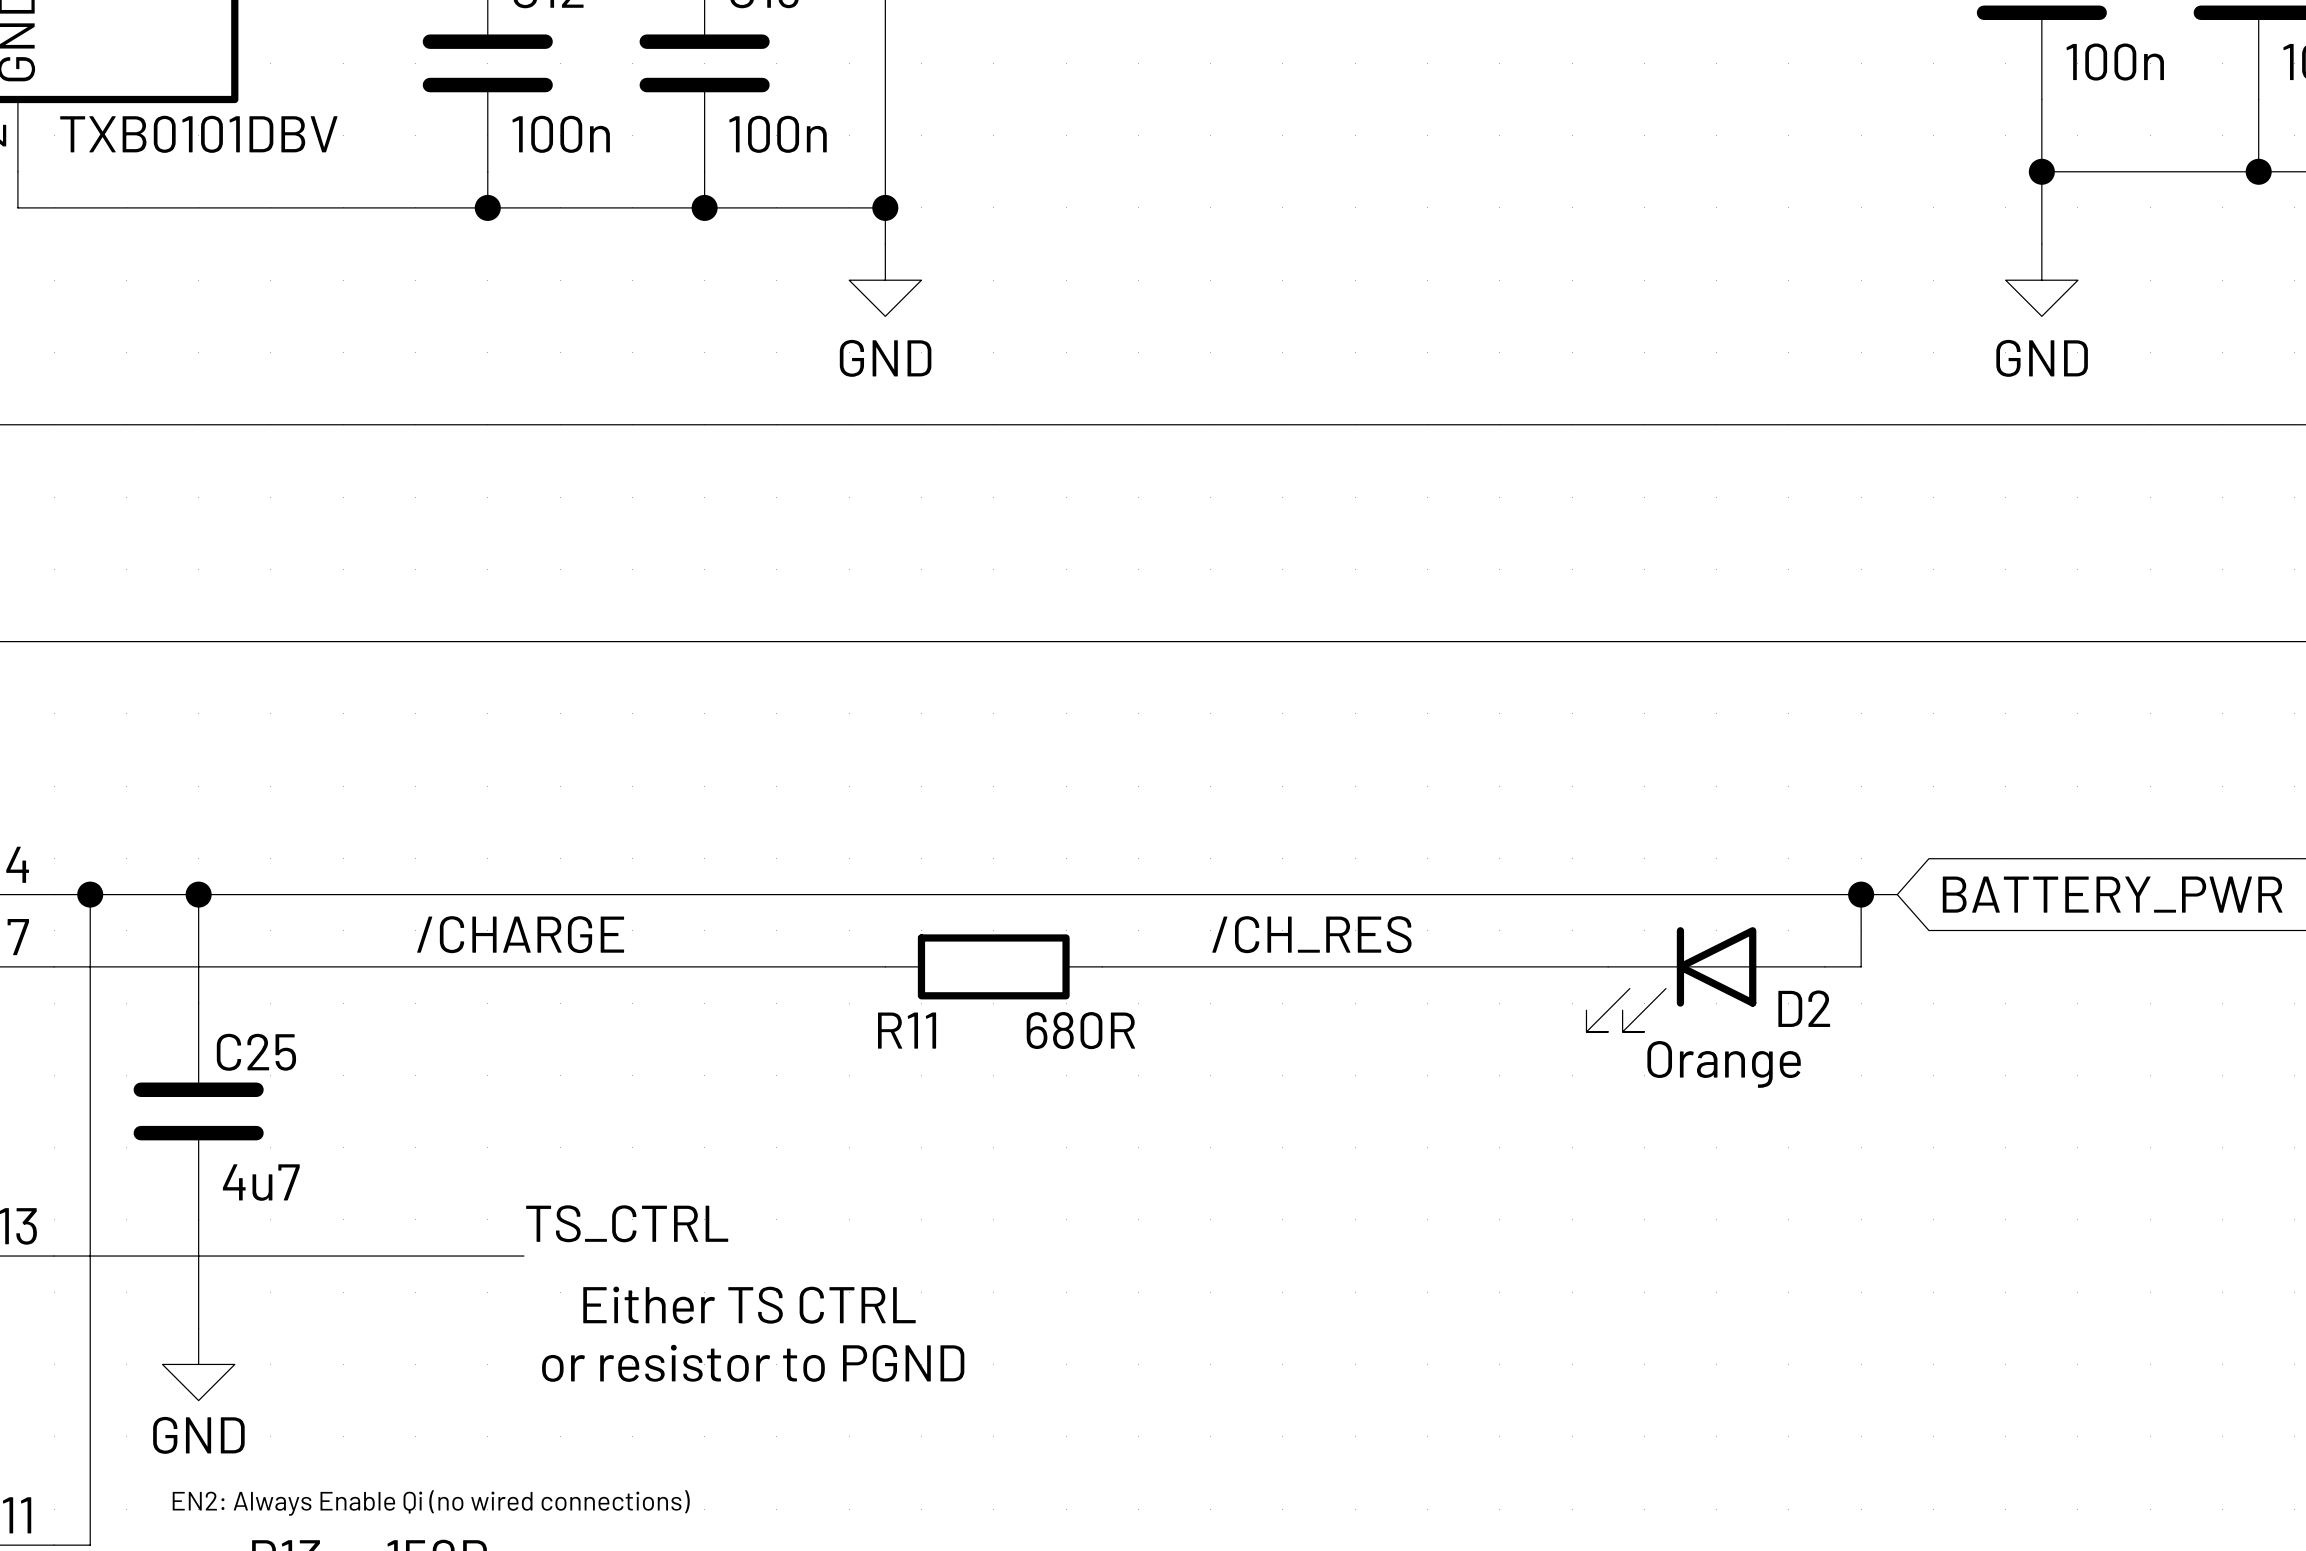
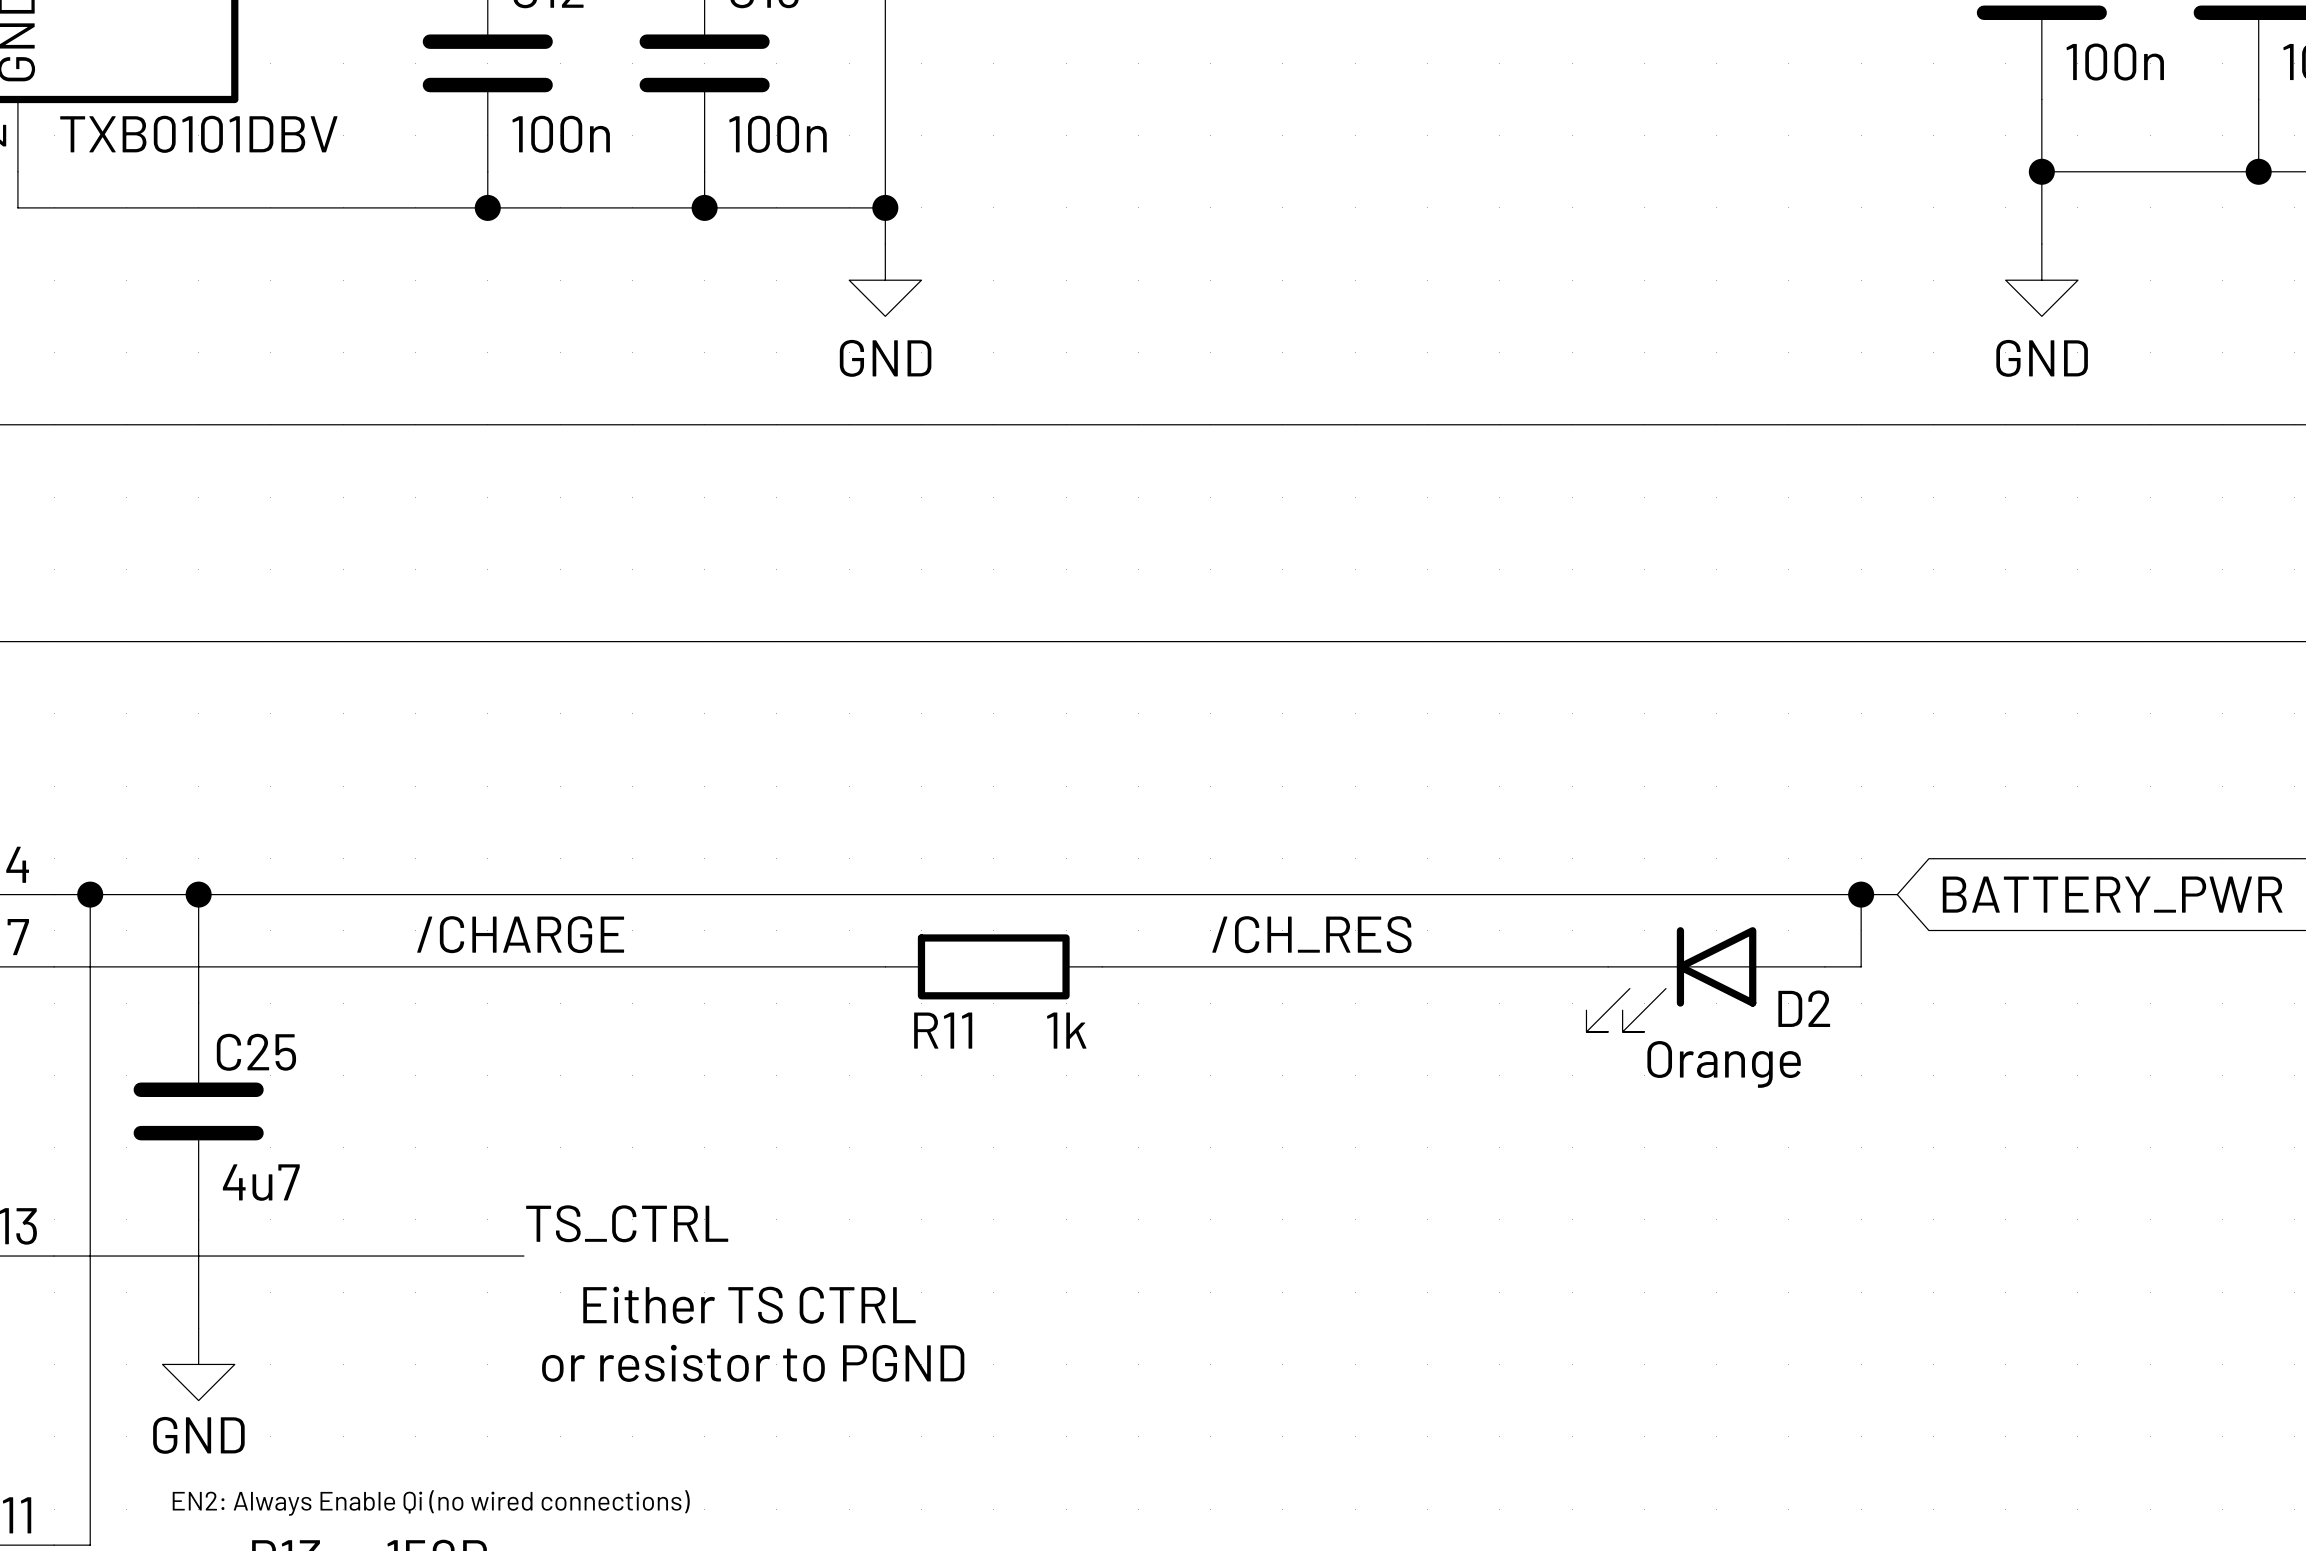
R11 name position: R11 (907, 1030) -> R11 (943, 1030)
R11 value: 680R (1080, 1030) -> 1k (1066, 1030)

